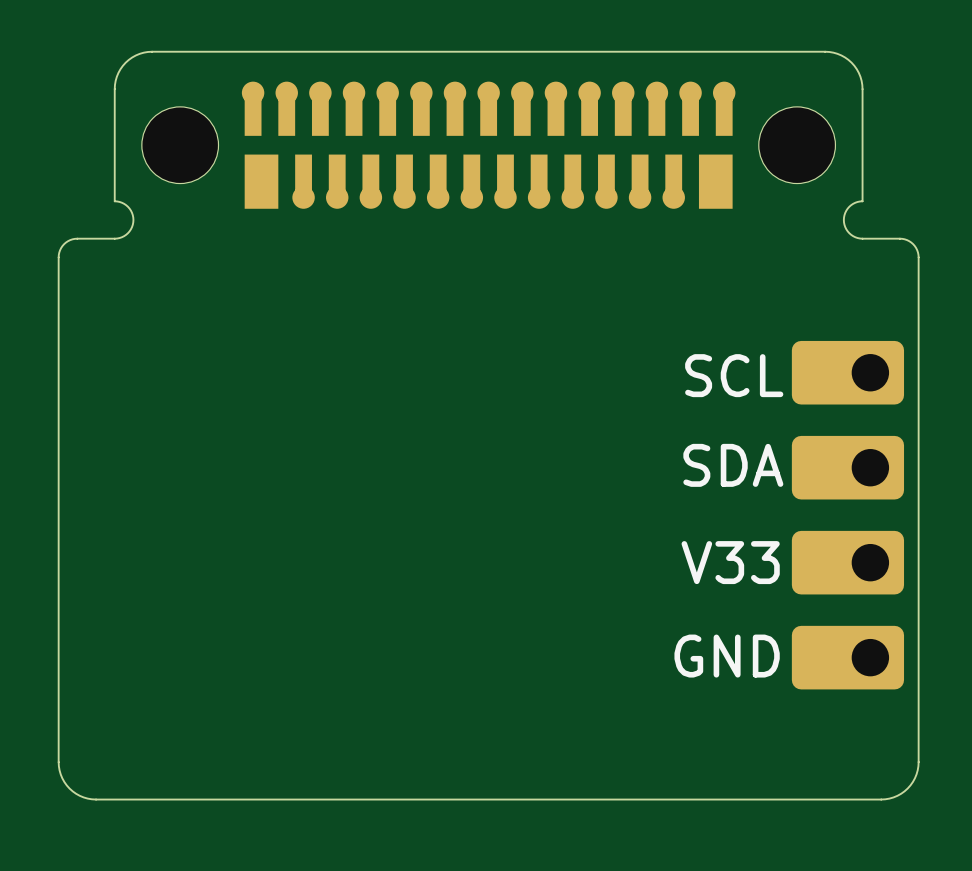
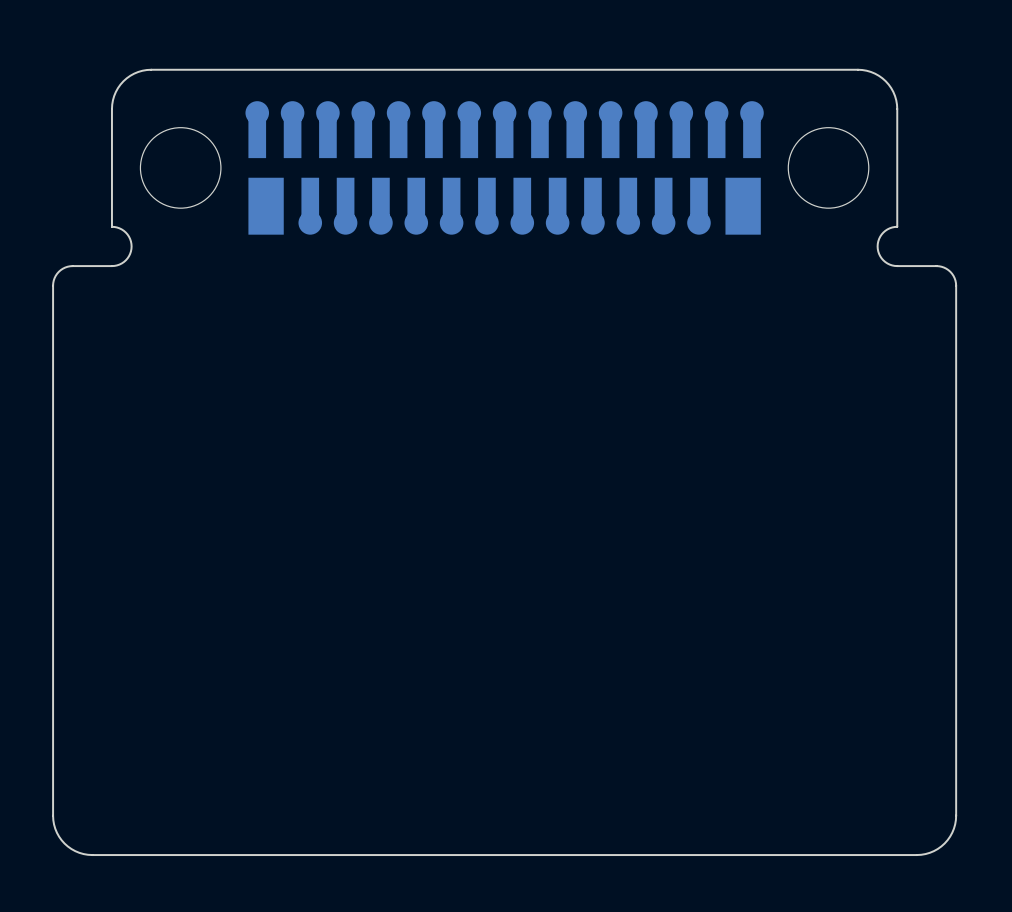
text: SCL (734, 375) -> none
text: SDA (733, 465) -> none
part: (847, 515) -> none
text: V33 (730, 562) -> none
text: GND (727, 656) -> none

